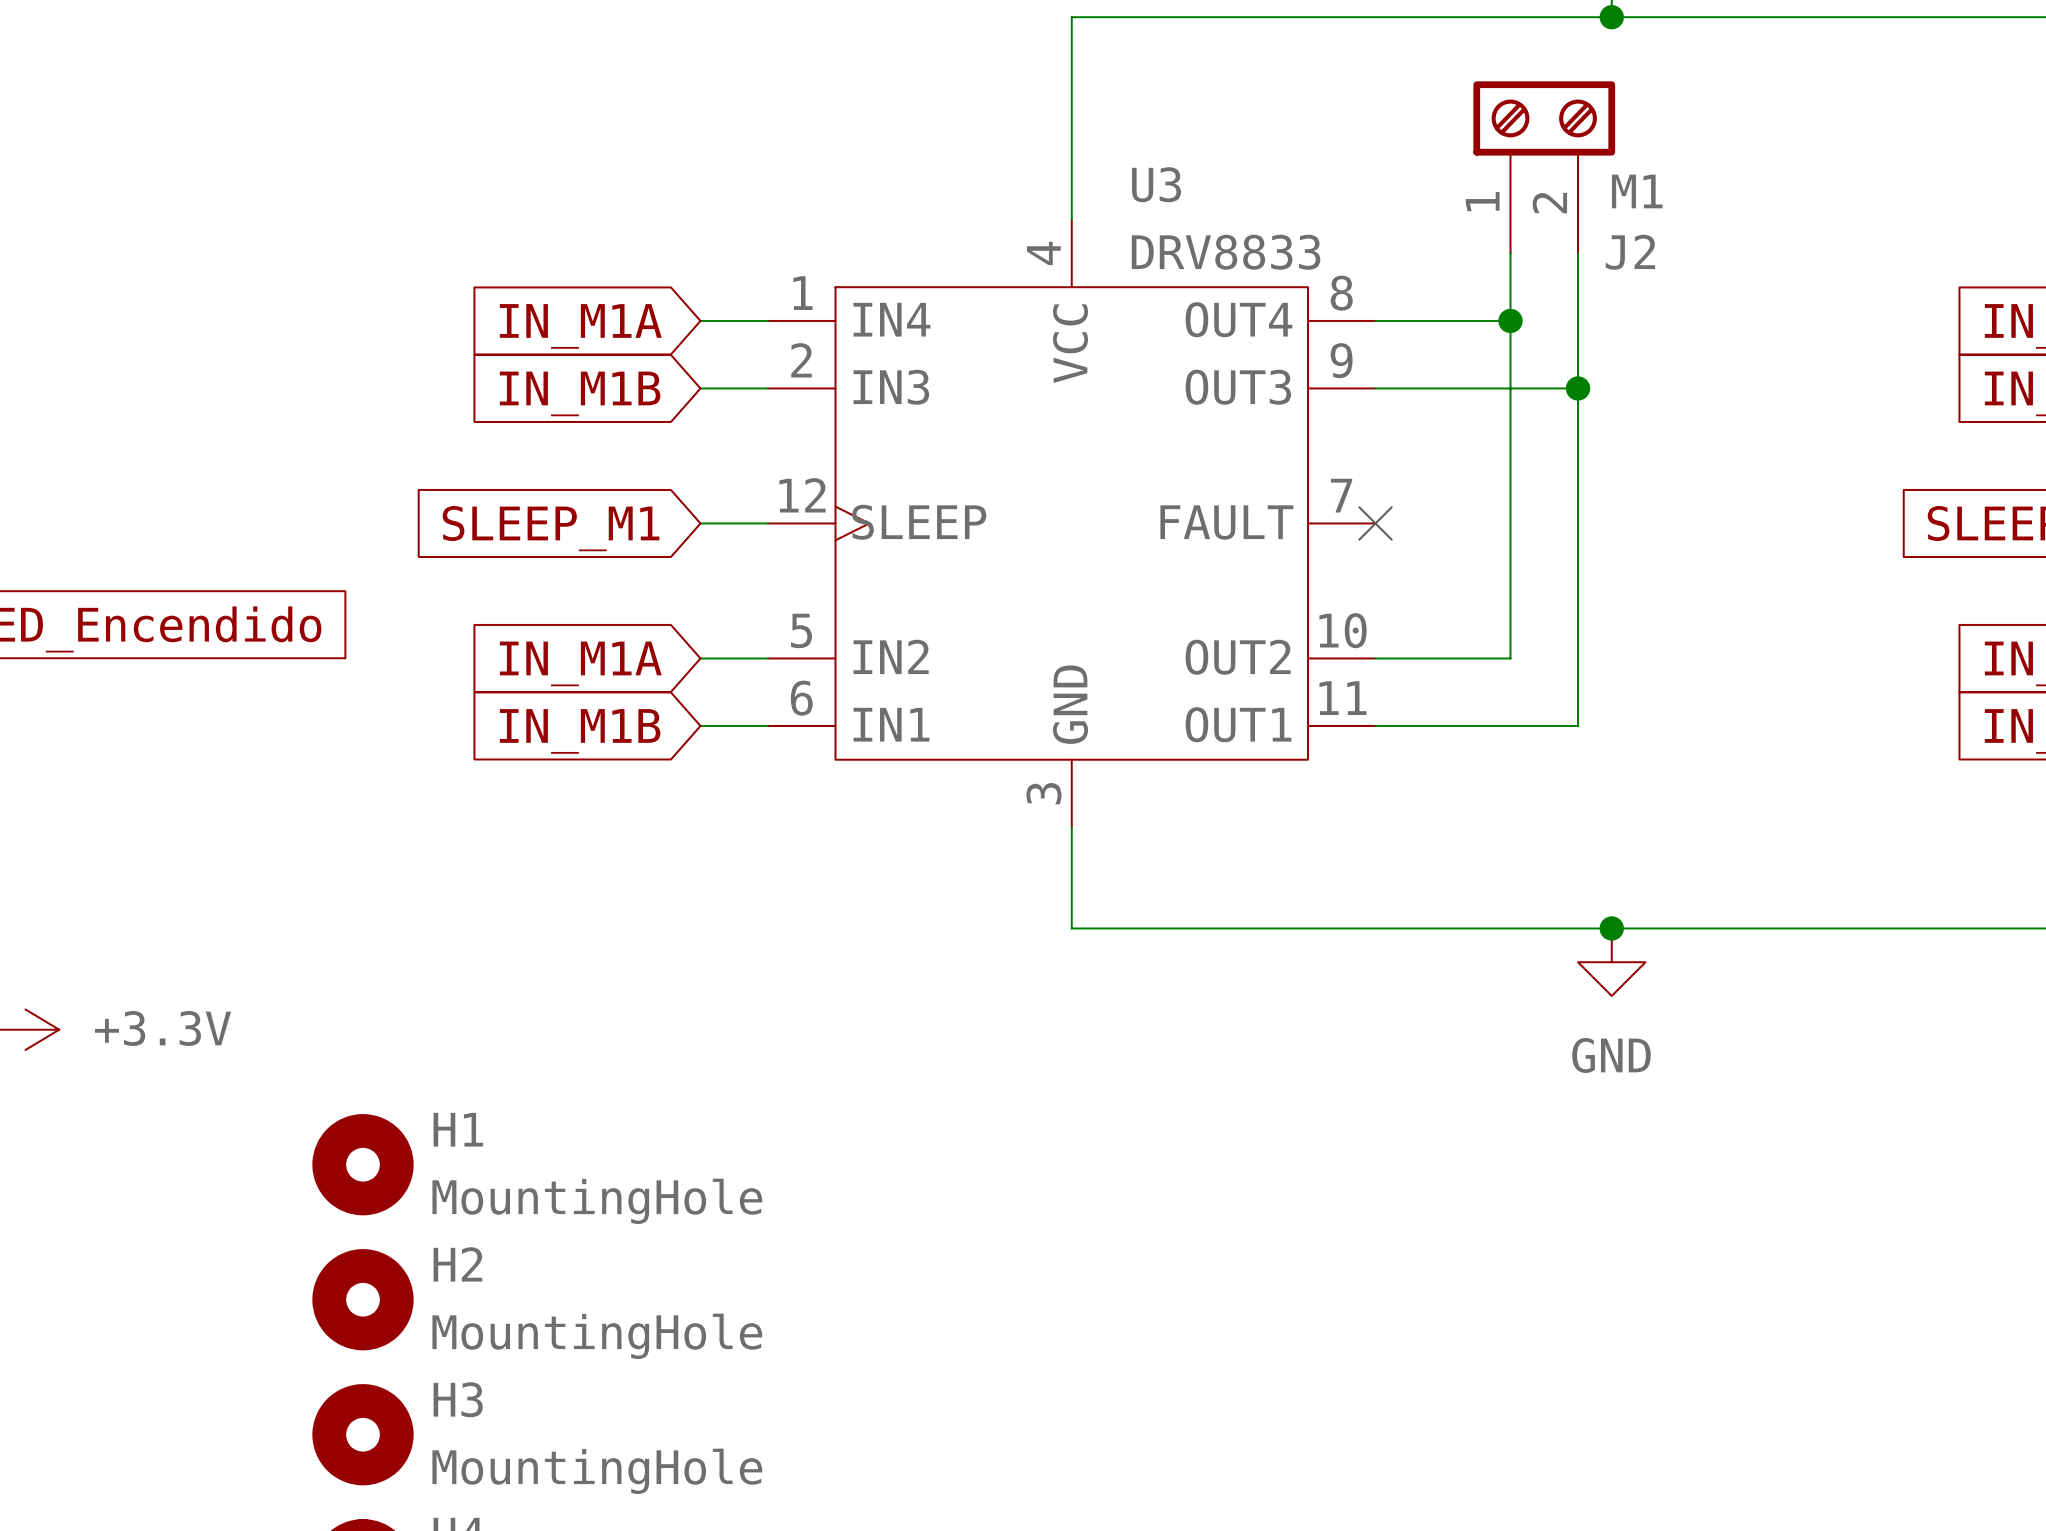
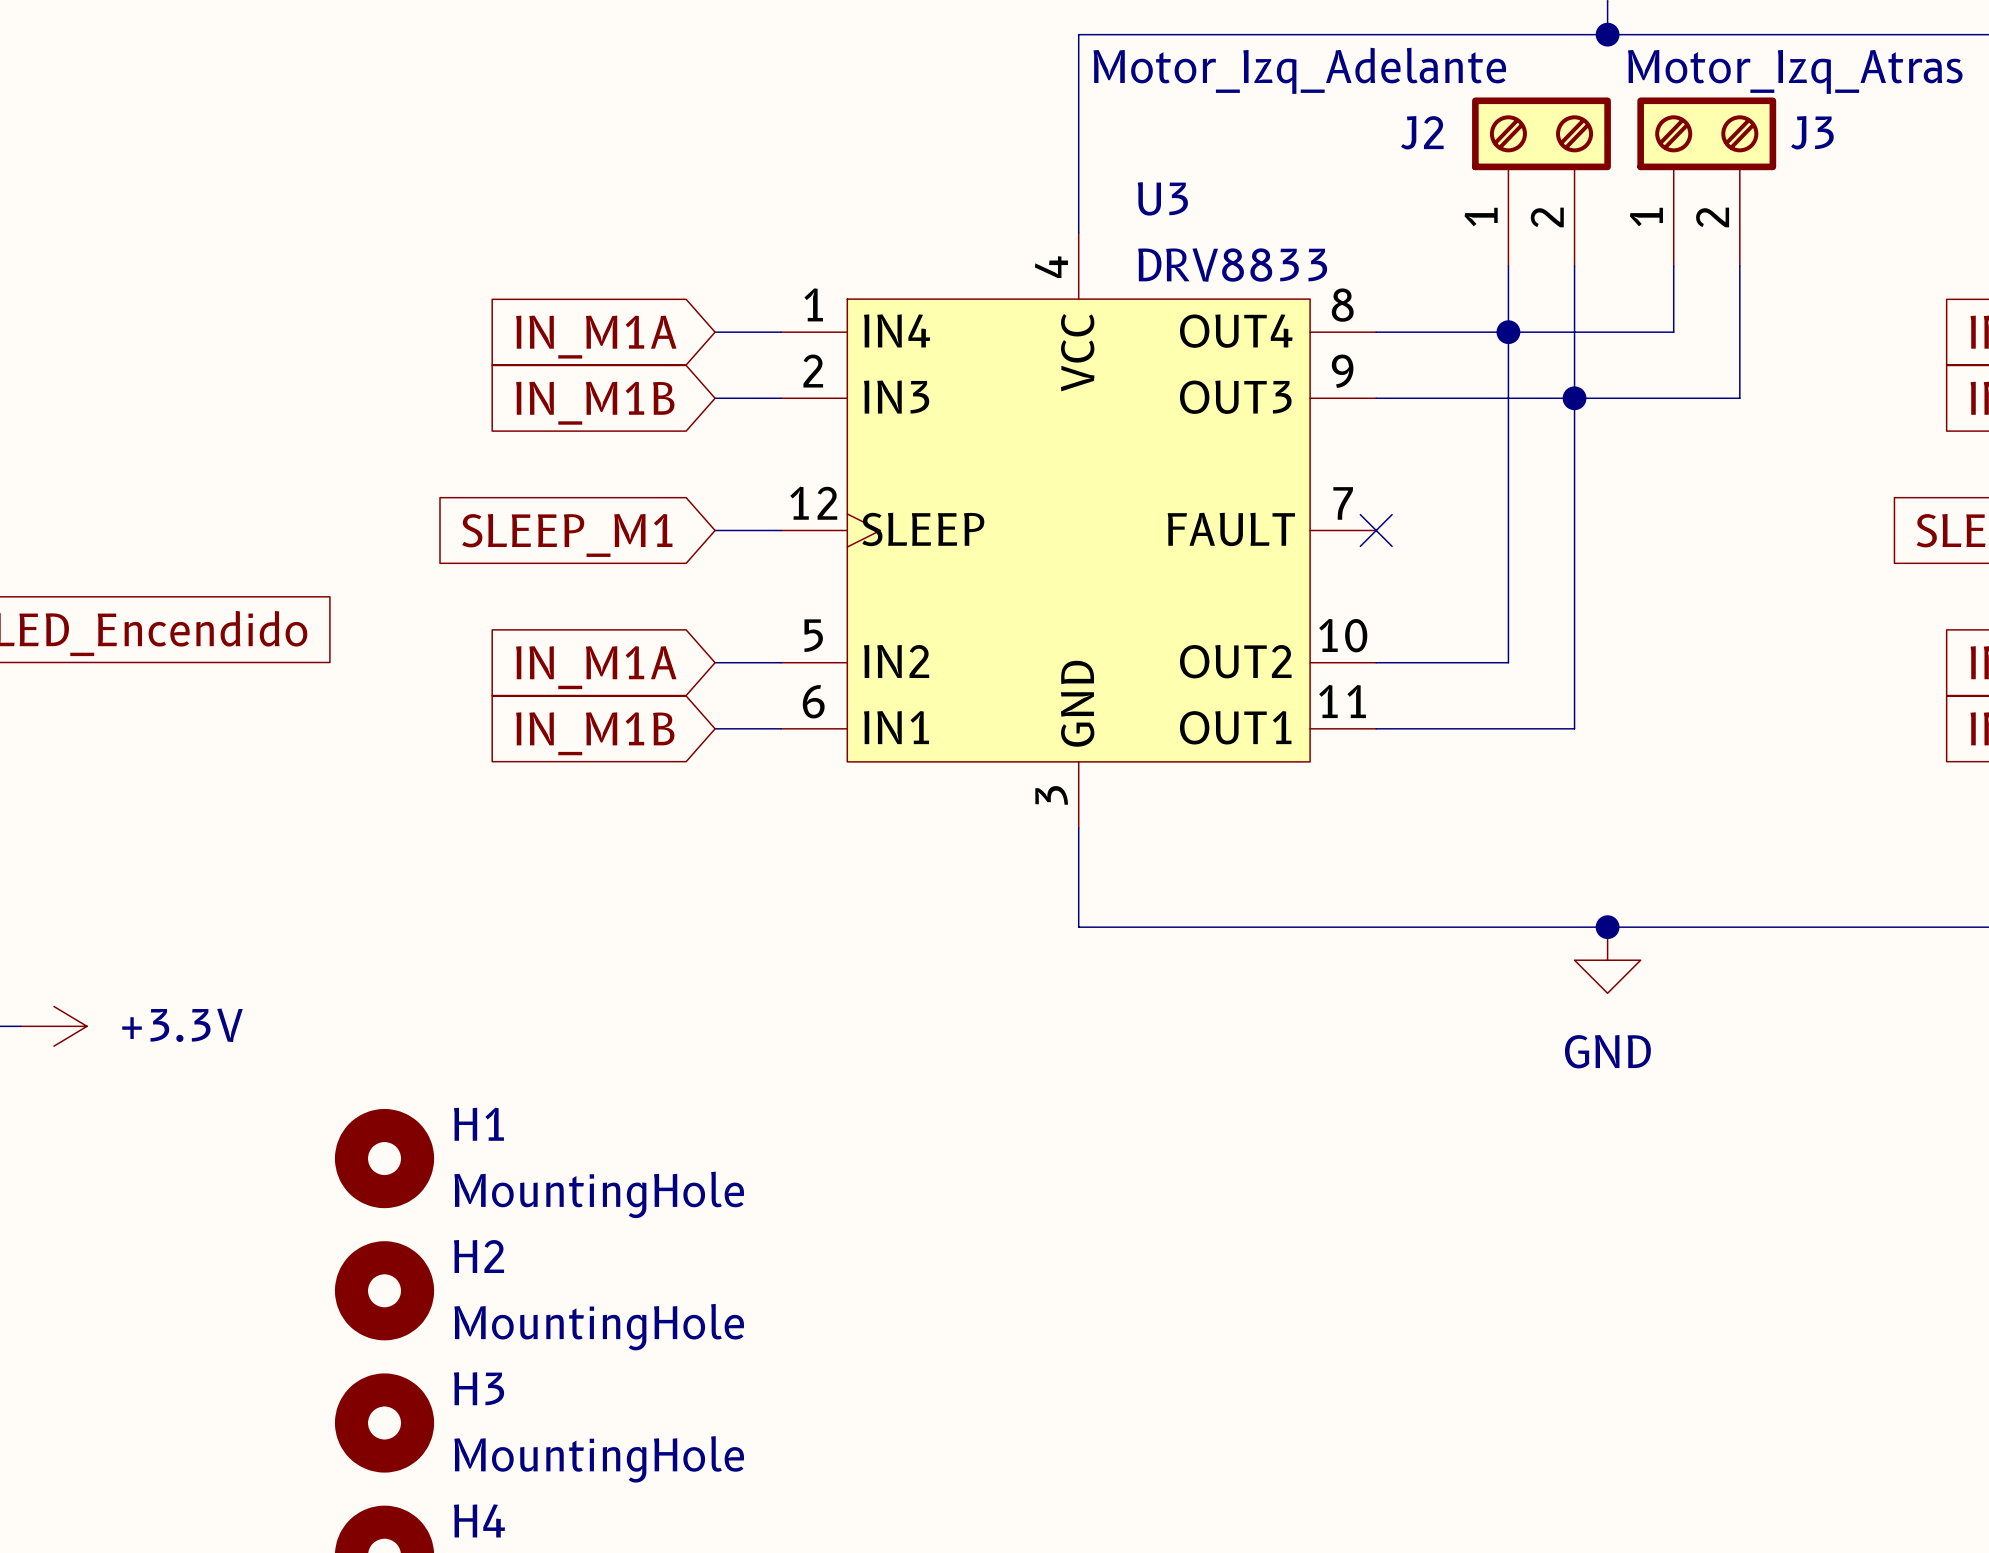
J3: none -> Motor_Izq_Atras (1706, 181)
J2 value: M1 (1637, 191) -> Motor_Izq_Adelante (1299, 70)
J2 name position: J2 (1630, 252) -> J2 (1422, 132)
wire: none -> (1673, 266) (1673, 332) (1508, 332)
wire: none -> (1739, 266) (1739, 398) (1574, 398)

